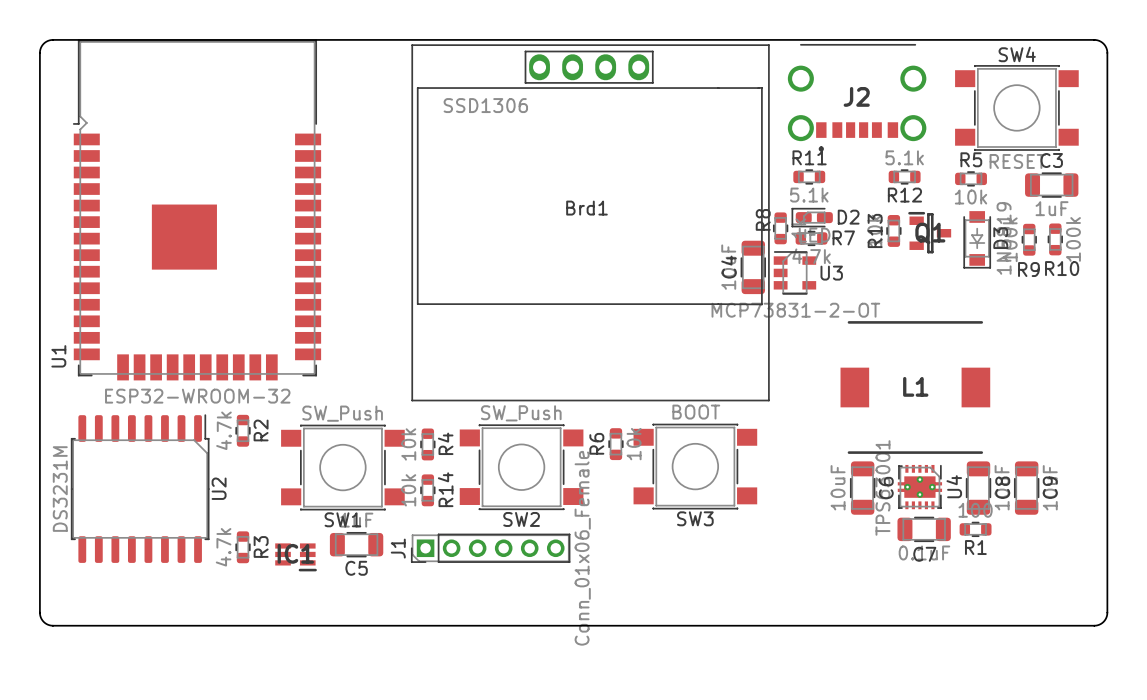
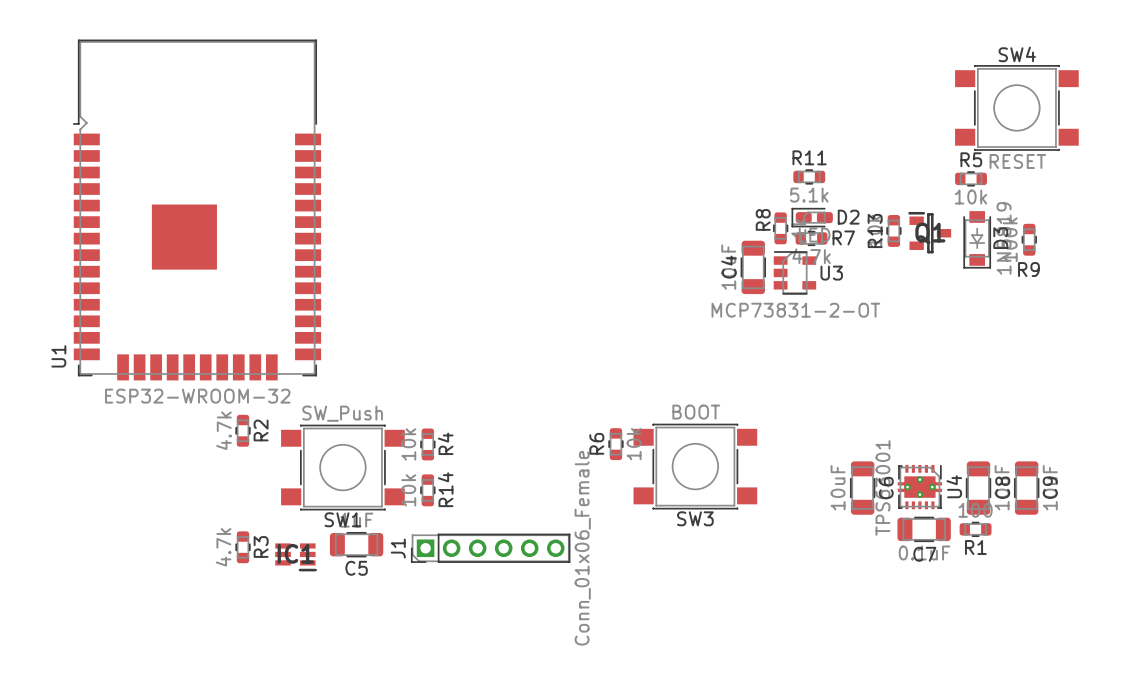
board edge: (52, 39) (1094, 39) (1100, 41) (1105, 46) (1107, 52) (1107, 612) (1105, 619) (1100, 623) (1094, 625) (52, 625) (46, 623) (41, 619) (39, 612) (39, 52) (43, 43) (52, 39) -> none
J2: (857, 97) -> none
R12: 5.1k (904, 176) -> none
C3: 1uF (1051, 185) -> none
Brd1: SSD1306 (590, 222) -> none
R10: 100k (1055, 239) -> none
L1: (915, 387) -> none
SW2: SW_Push (521, 467) -> none
U2: DS3231M (140, 488) -> none

